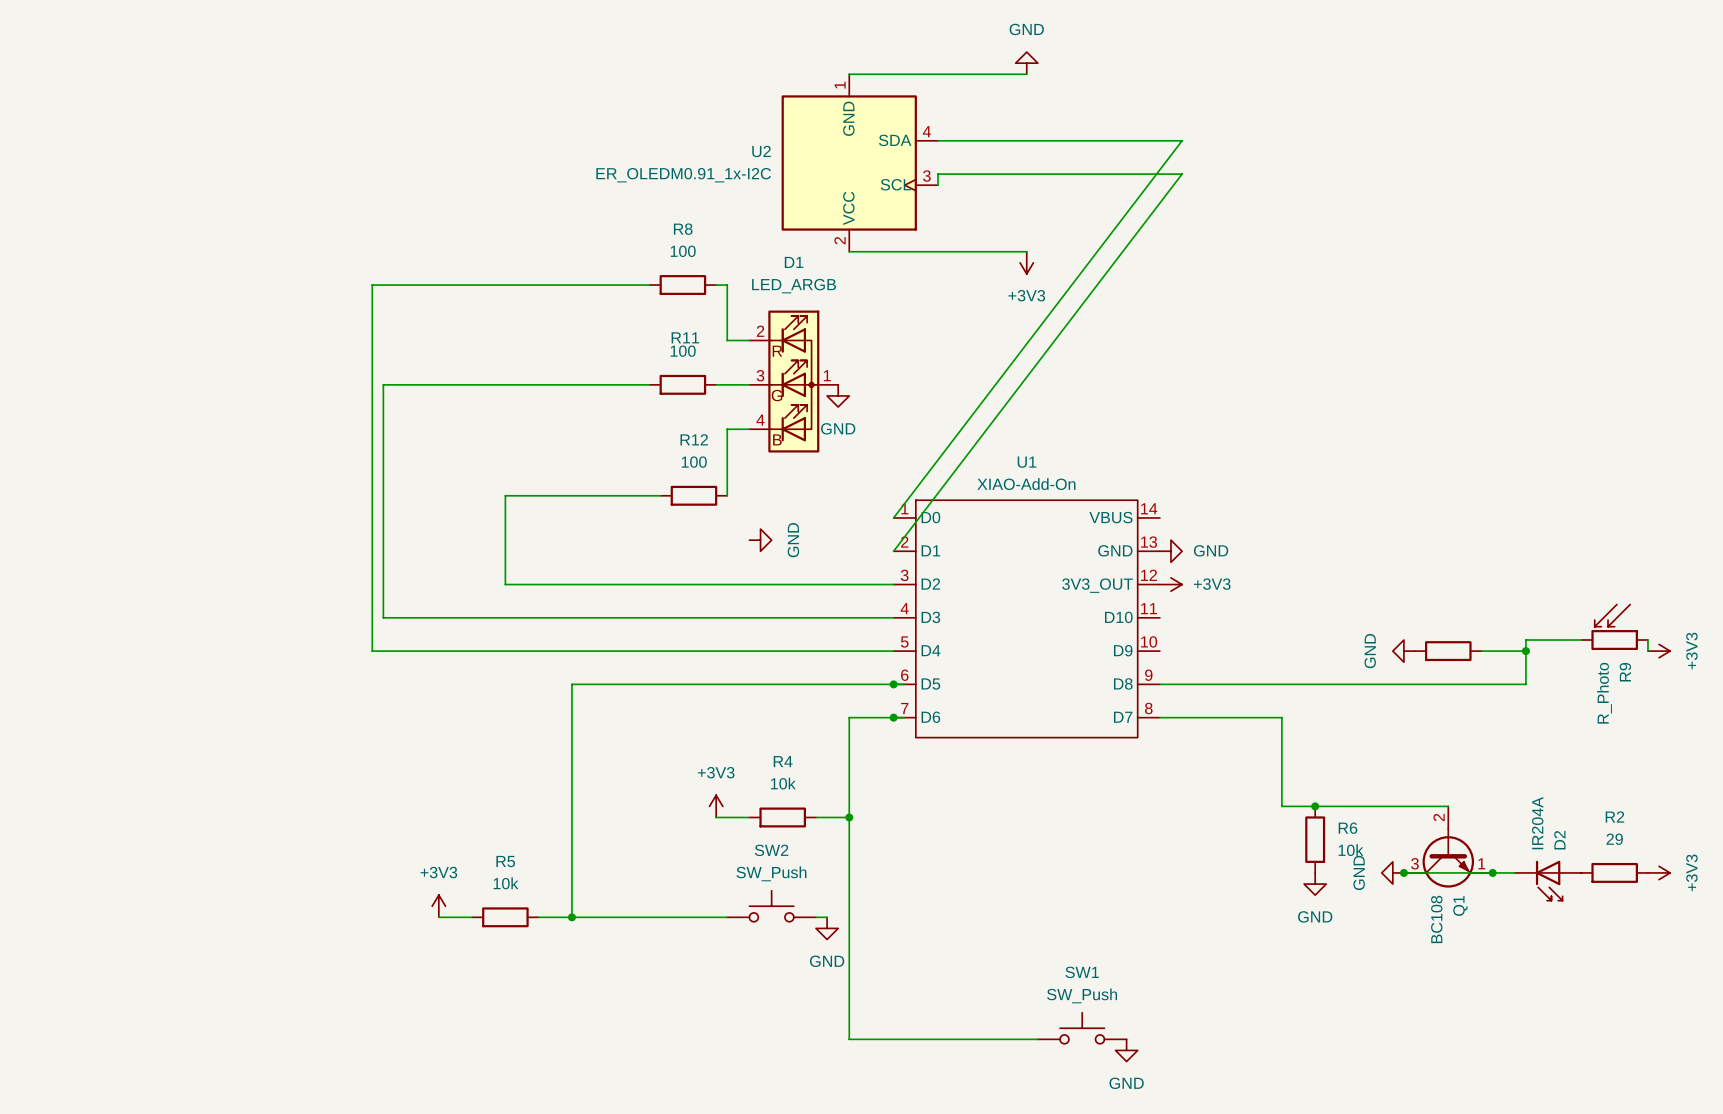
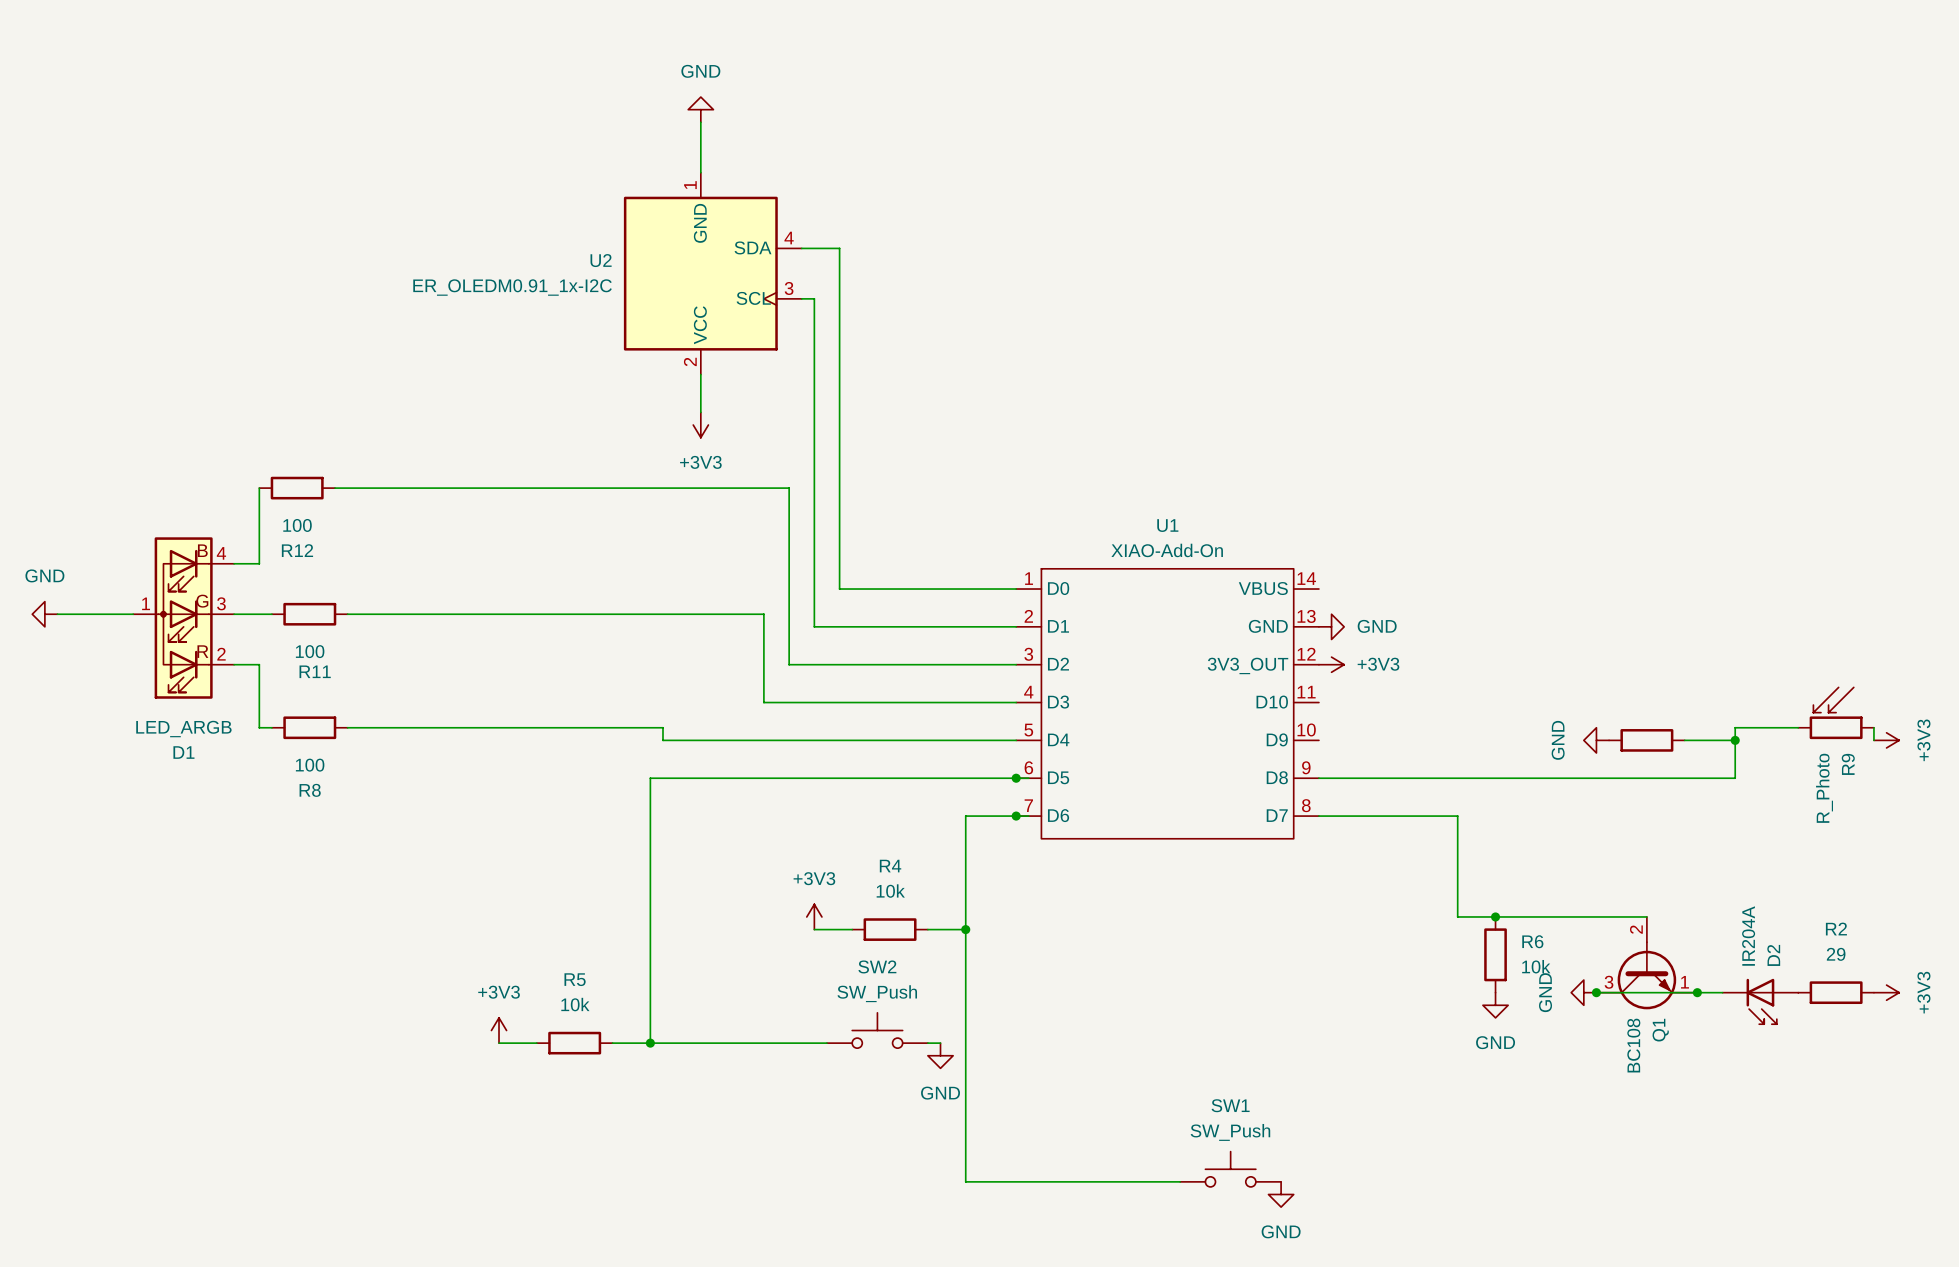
power symbol: GND (1026, 63) -> none
wire: (849, 74) (1026, 74) -> none
power symbol: none -> GND (700, 109)
wire: none -> (700, 122) (700, 172)
wire: (938, 140) (1182, 140) (893, 517) -> (801, 248) (839, 248) (839, 589) (1016, 589)
U2 position: (859, 163) -> (712, 273)
wire: (938, 185) (938, 174) (1182, 174) (893, 551) -> (801, 298) (814, 298) (814, 626) (1016, 626)
R8 name position: R8 (683, 229) -> R8 (310, 790)
R8 value position: 100 (683, 251) -> 100 (310, 765)
wire: (849, 251) (1026, 251) -> none
power symbol: +3V3 (1026, 262) -> none
wire: (649, 285) (372, 285) (372, 651) (583, 651) -> (347, 727) (662, 727) (662, 740)
R8 position: (682, 285) -> (309, 727)
wire: (716, 285) (727, 285) (727, 340) (749, 340) -> none
wire: none -> (700, 374) (700, 412)
R11 name position: R11 (685, 337) -> R11 (315, 671)
R11 value position: 100 (683, 351) -> 100 (310, 651)
power symbol: none -> +3V3 (700, 425)
D1 rotation: 0° (793, 381) -> 180° (183, 618)
D1 position: (793, 381) -> (183, 618)
wire: (649, 384) (383, 384) (383, 617) (671, 617) -> (347, 614) (763, 614) (763, 702)
R11 position: (682, 384) -> (309, 614)
wire: (716, 384) (749, 384) -> none
power symbol: GND (838, 395) -> none
wire: none -> (259, 488) (259, 563) (234, 563)
wire: (749, 429) (727, 429) (727, 495) -> none
R12 name position: R12 (694, 439) -> R12 (297, 550)
R12 value position: 100 (694, 462) -> 100 (297, 525)
wire: (660, 495) (505, 495) (505, 584) (693, 584) -> (335, 488) (789, 488) (789, 664)
R12 position: (693, 495) -> (297, 488)
power symbol: none -> GND (44, 614)
wire: none -> (57, 614) (133, 614)
wire: none -> (234, 614) (271, 614)
power symbol: GND (760, 540) -> none
wire: none -> (234, 664) (259, 664) (259, 727) (271, 727)

